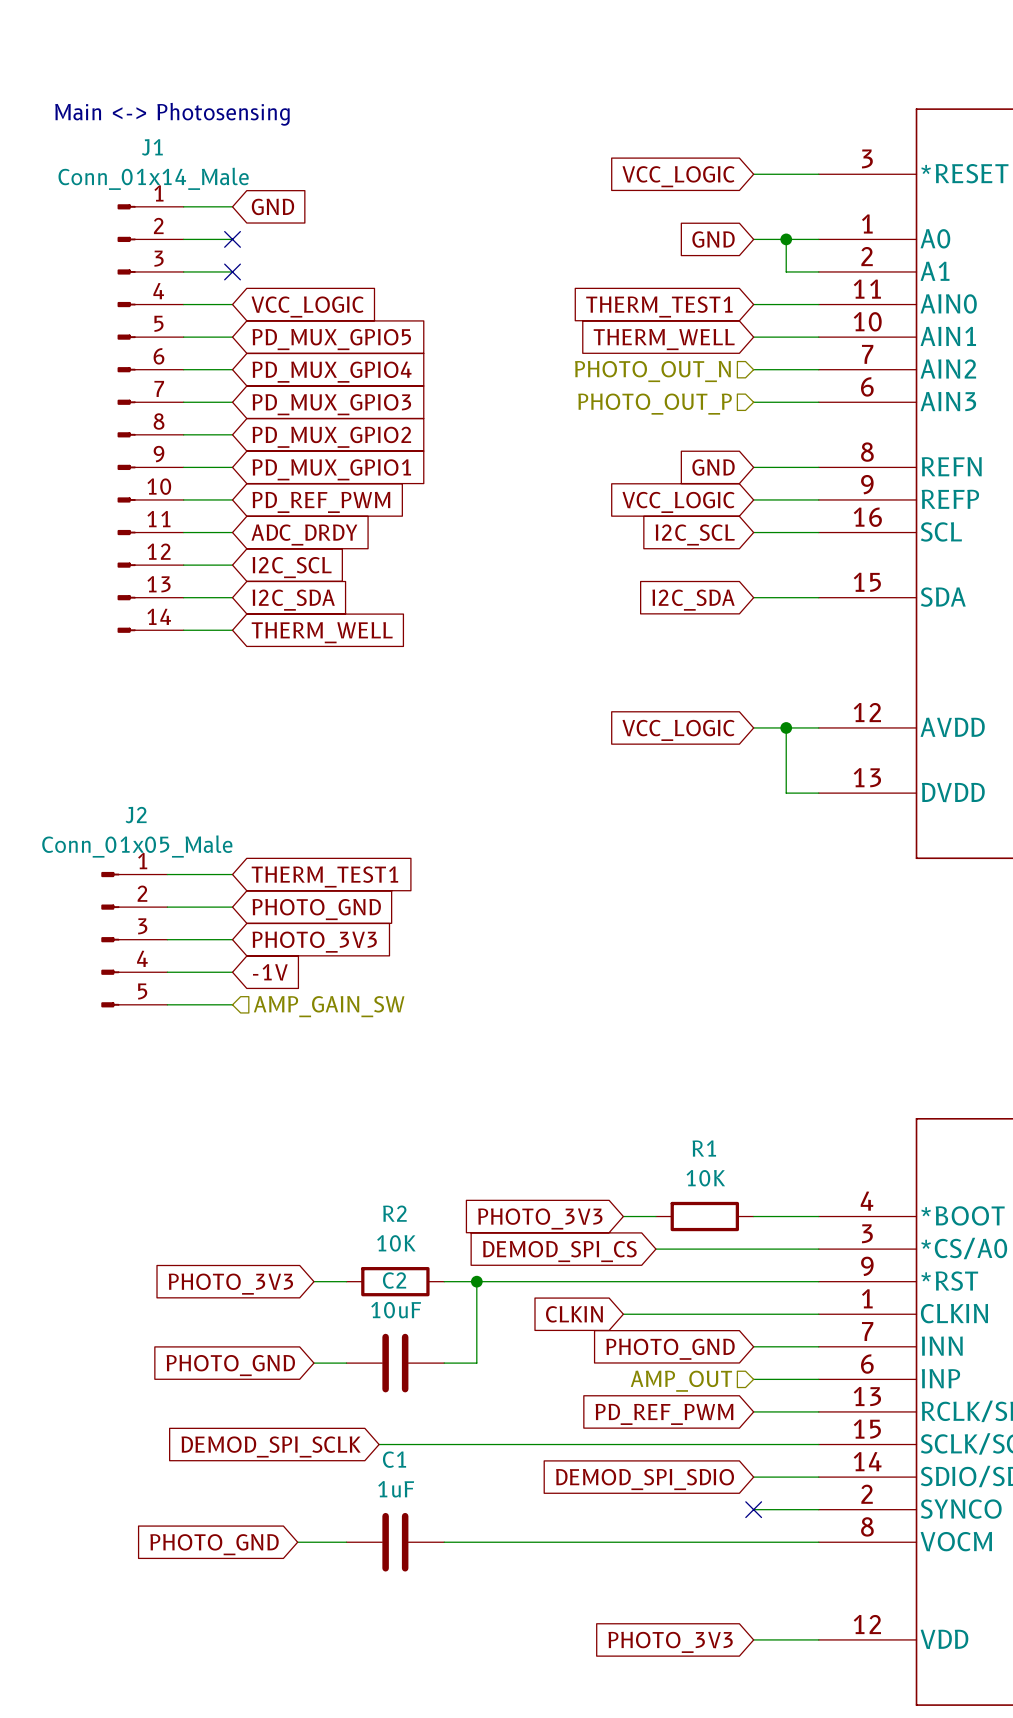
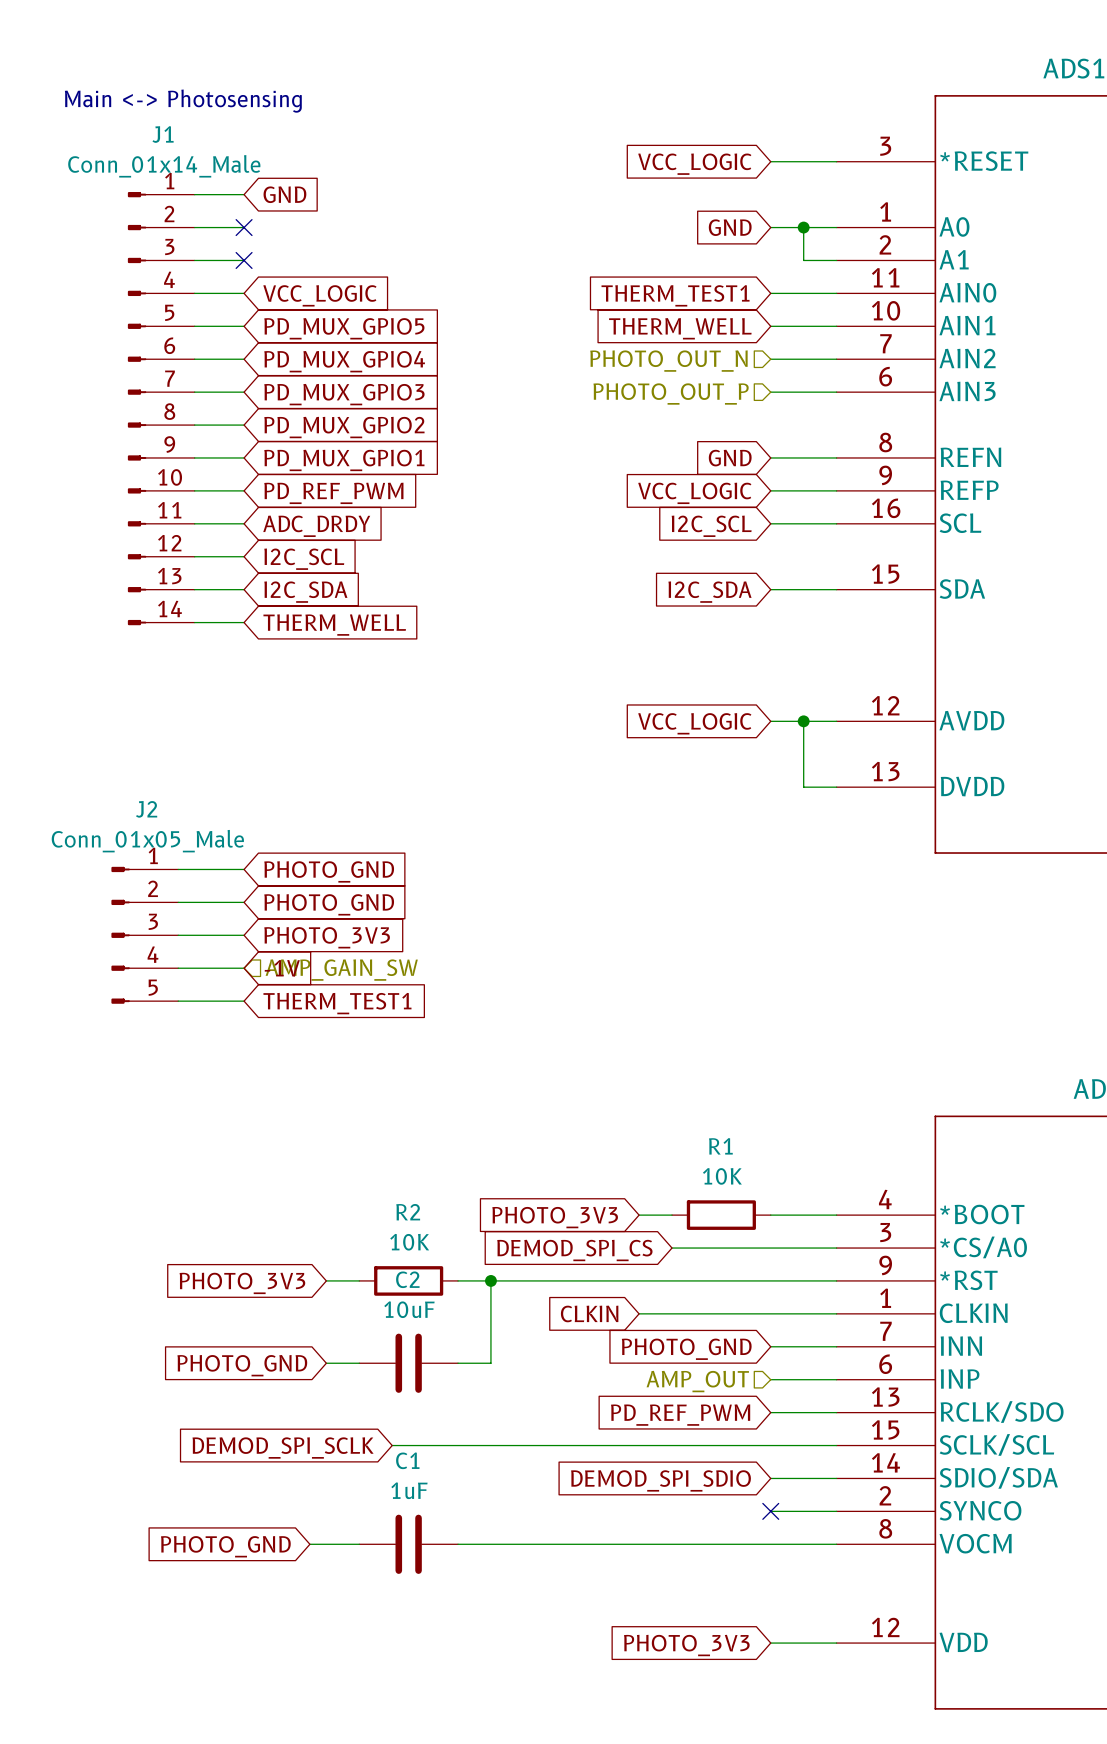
global label: THERM_TEST1 (324, 876) -> PHOTO_GND (329, 871)
hierarchical label position: AMP_GAIN_SW (329, 1006) -> AMP_GAIN_SW (341, 970)
global label: none -> THERM_TEST1 (337, 1003)

